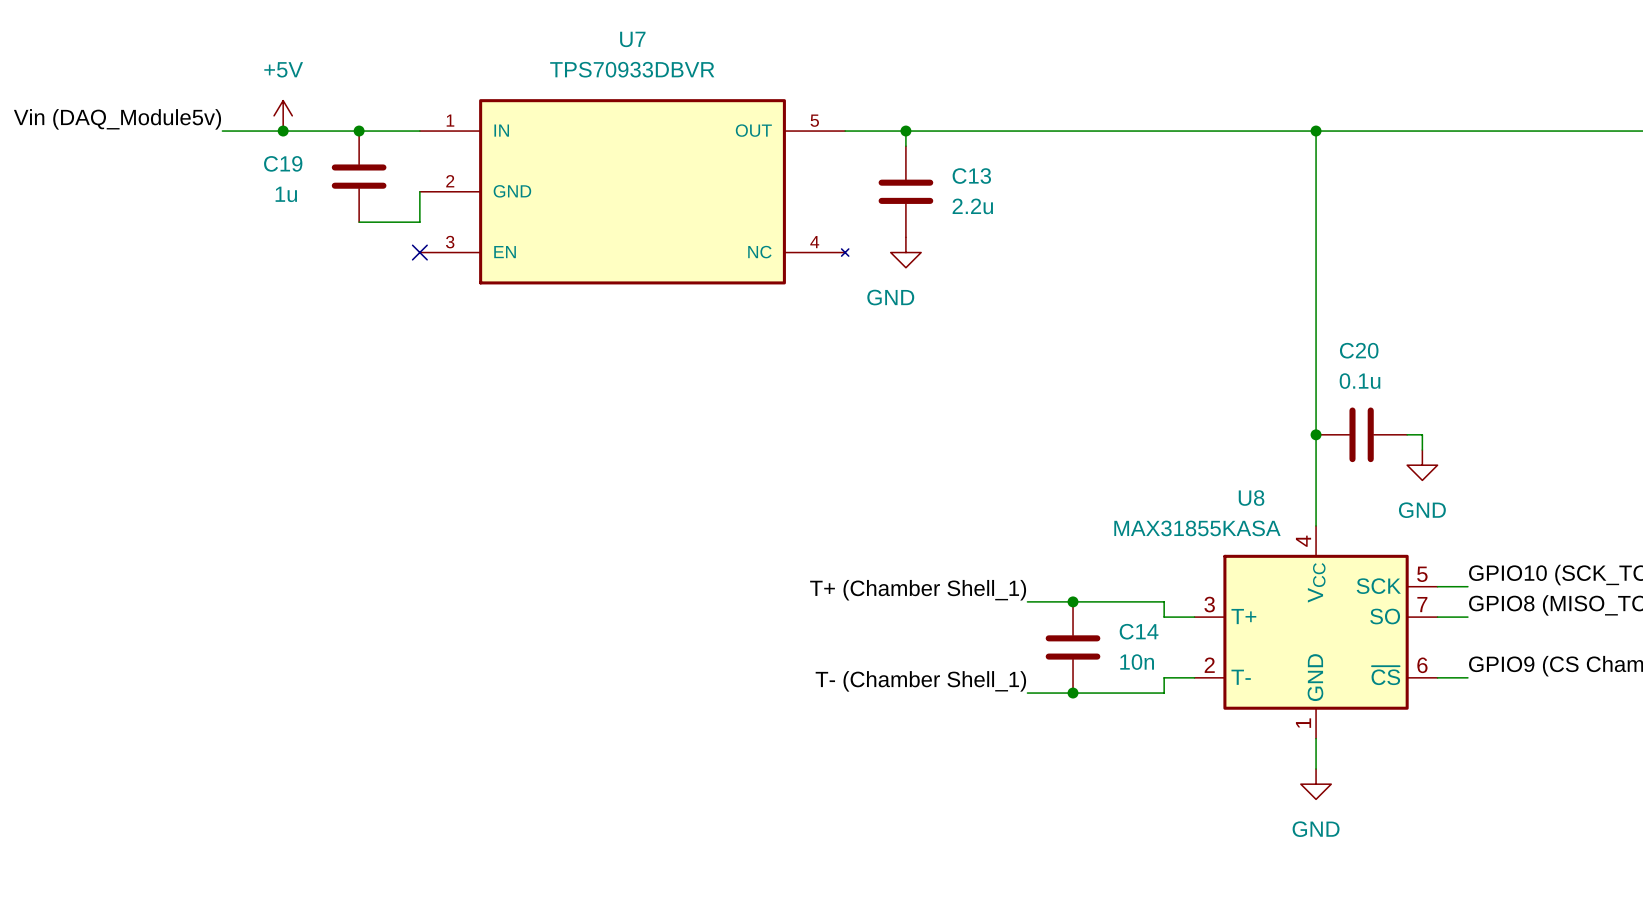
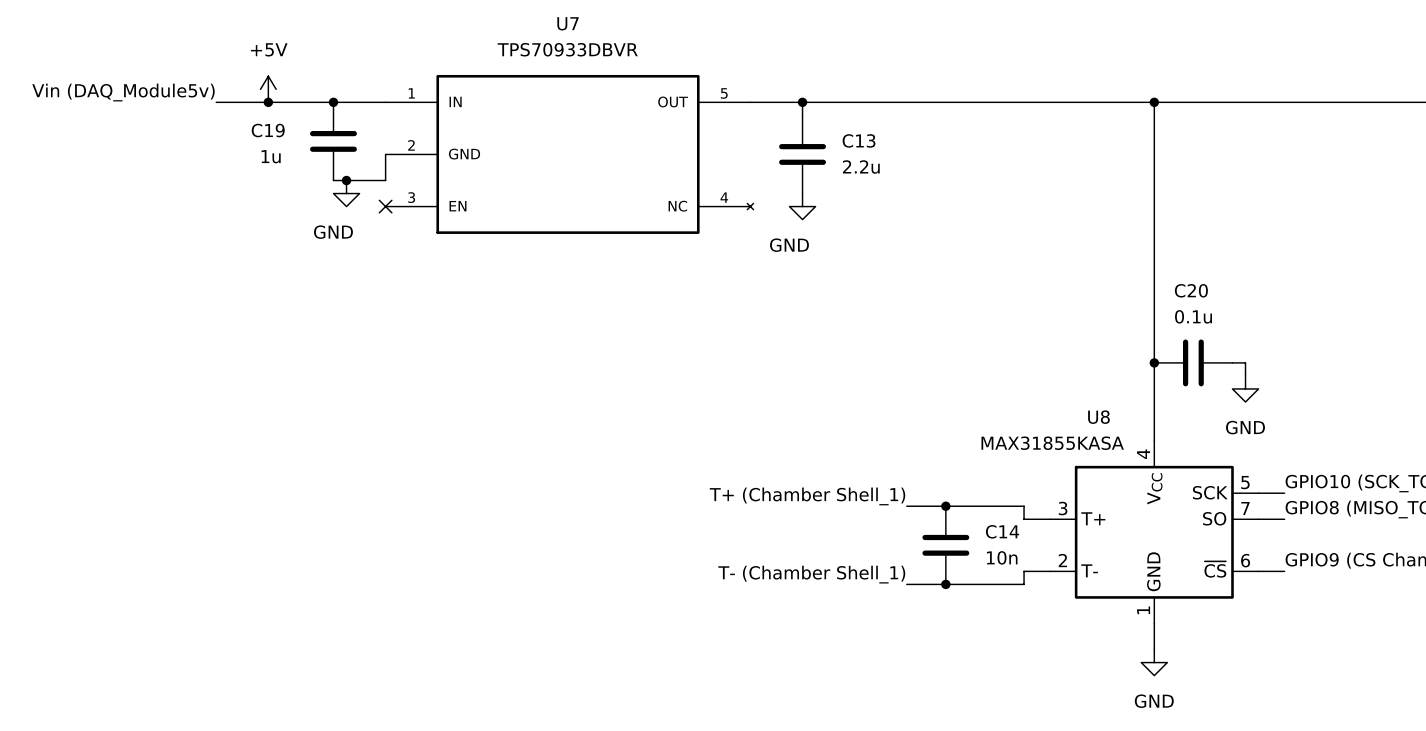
junction: none -> (346, 180)
power symbol: none -> GND (346, 193)

